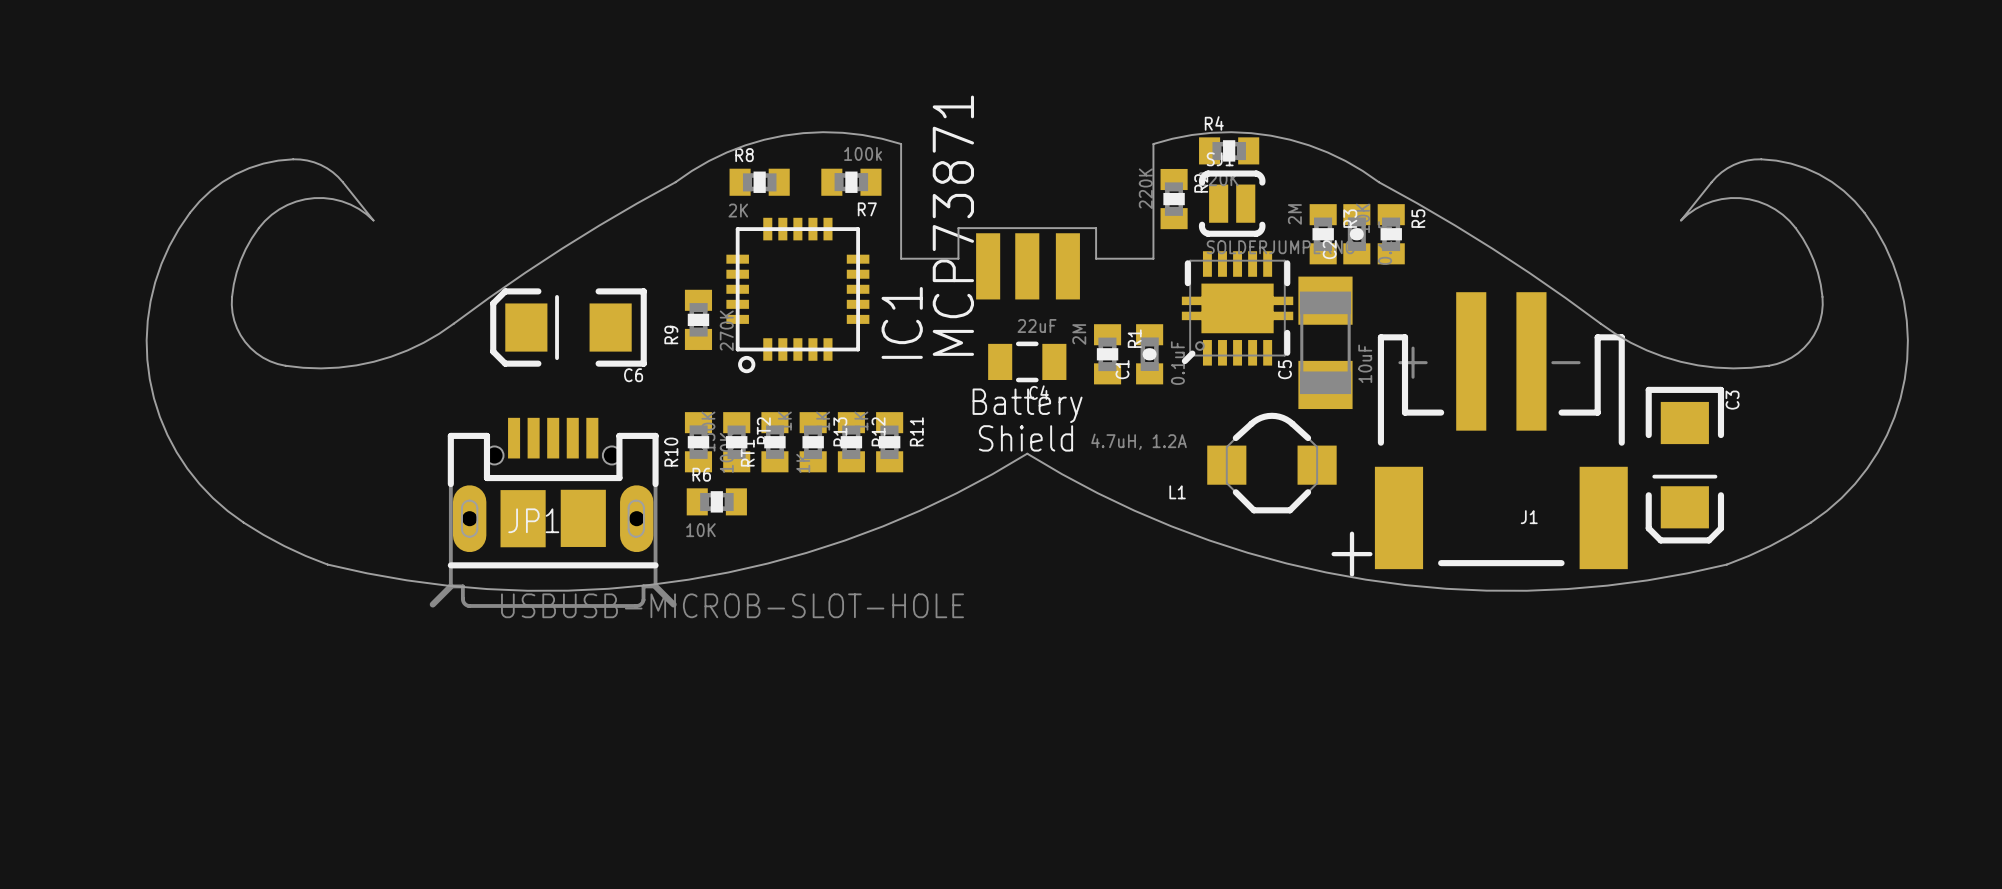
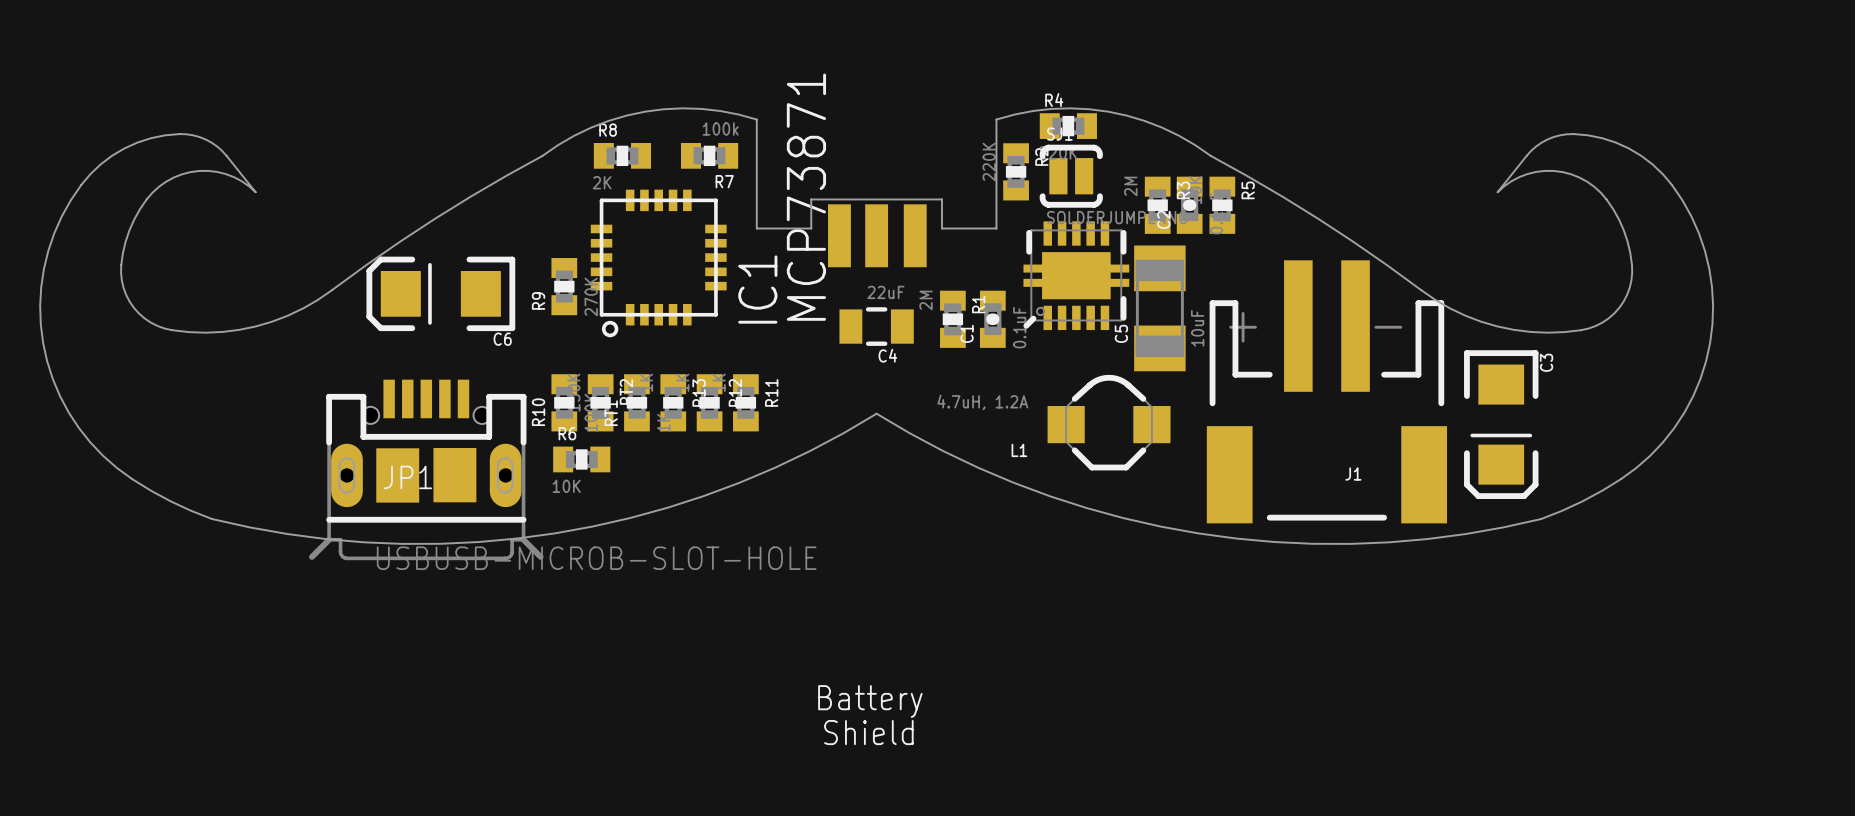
text position: Battery (1027, 405) -> Battery (870, 701)
text position: Shield (1025, 438) -> Shield (868, 732)
text: + (1352, 554) -> none

